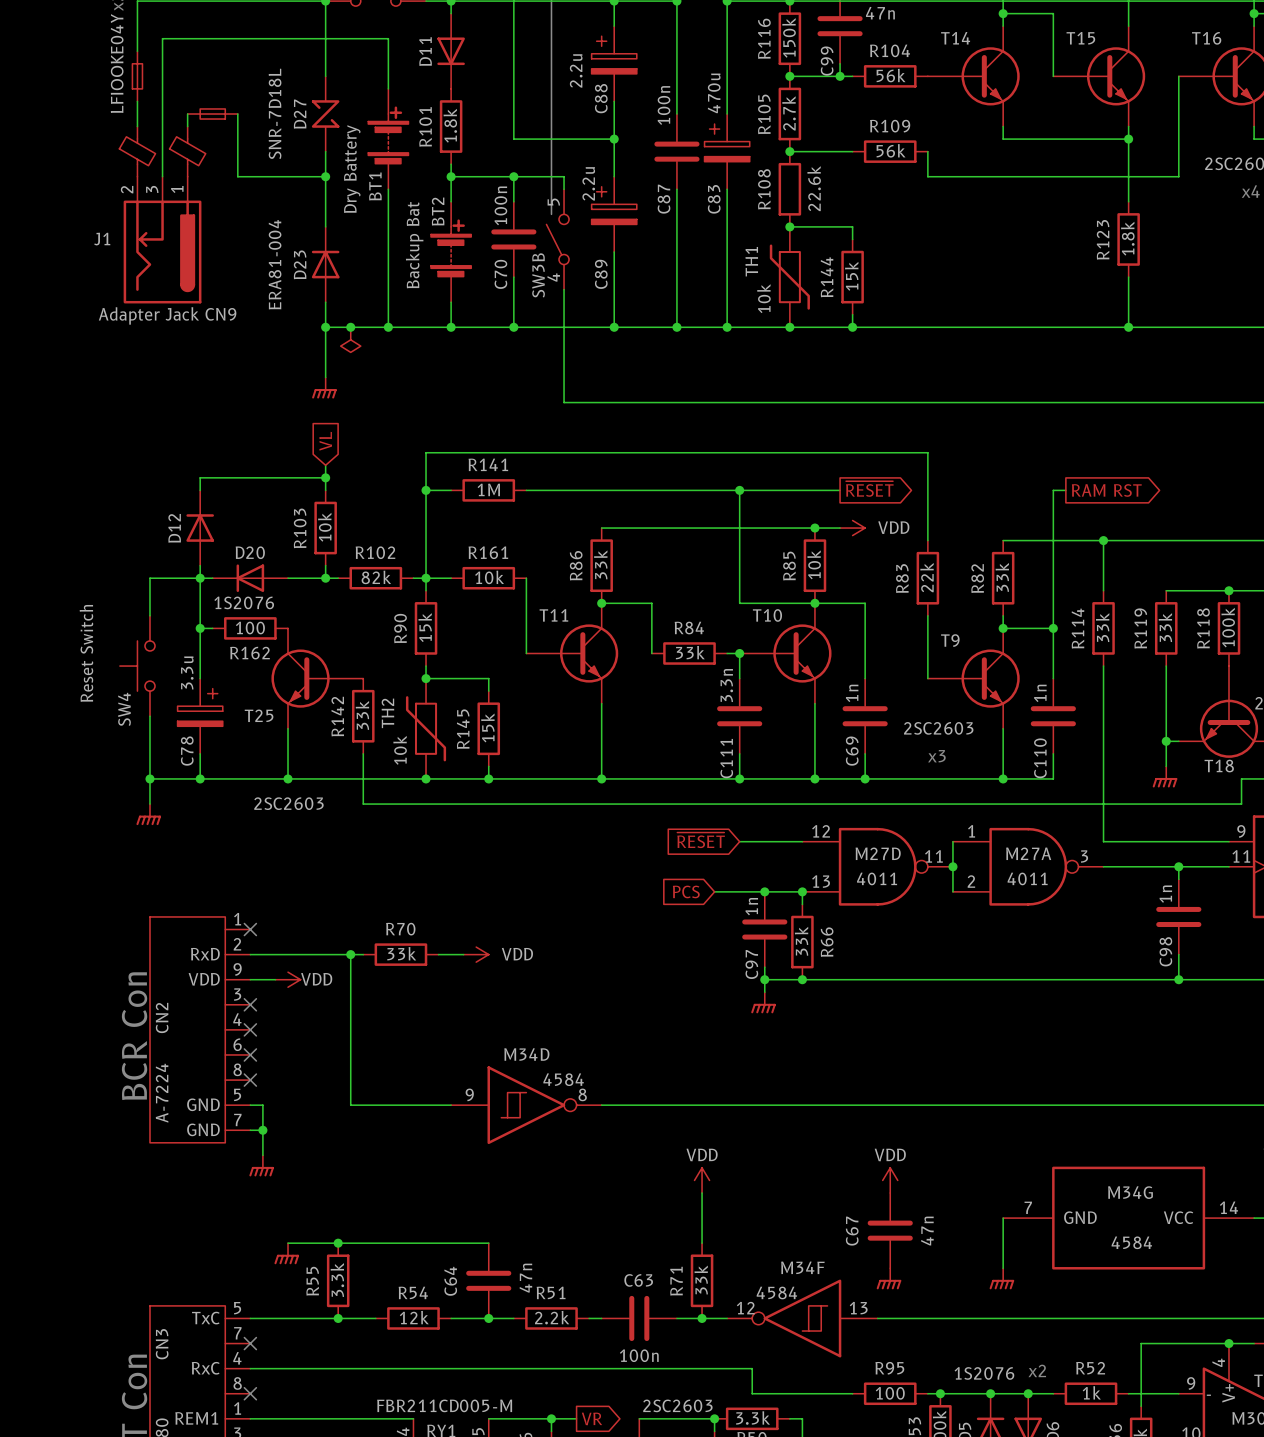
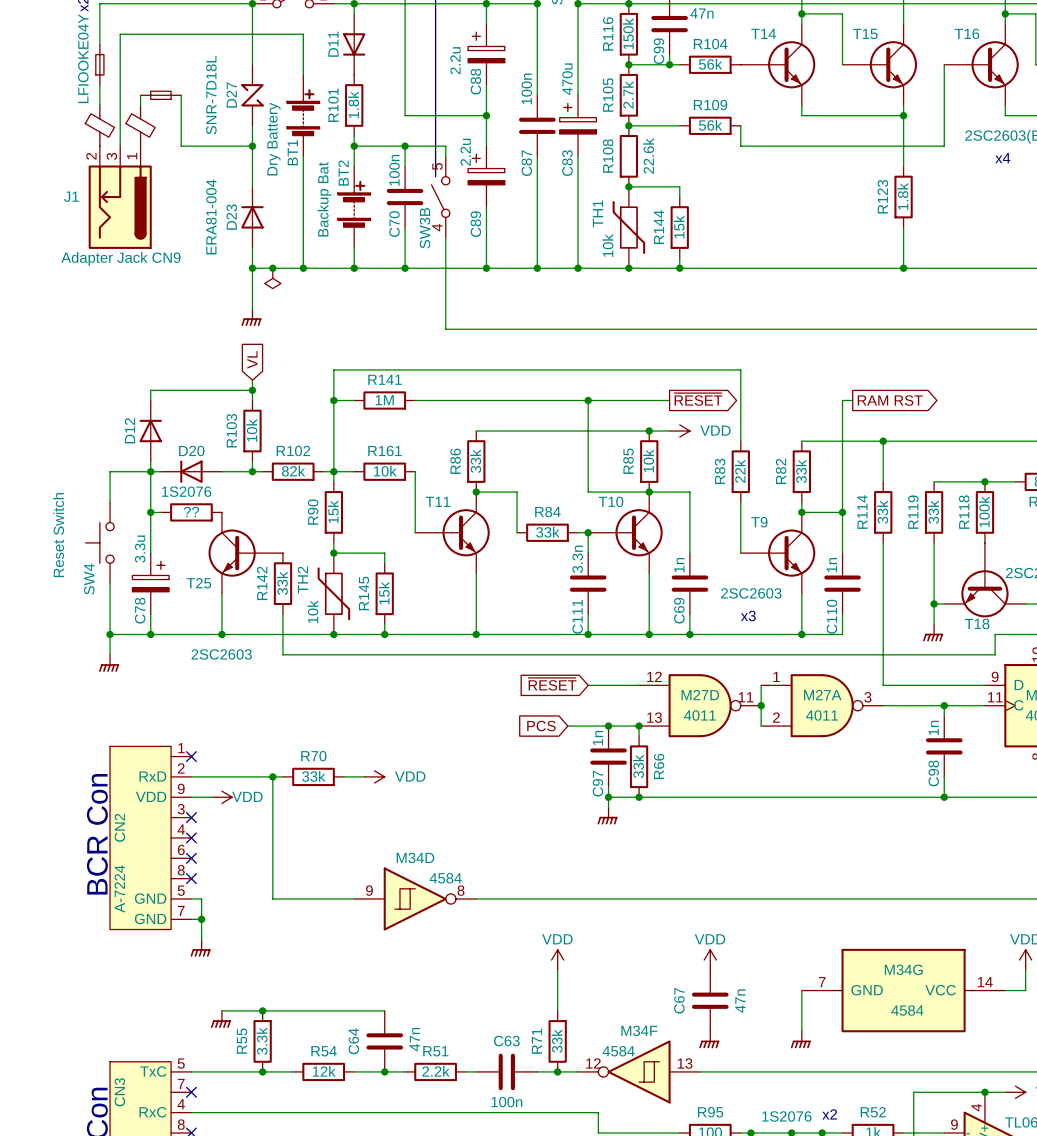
R162 value: 100 (250, 628) -> ?? (191, 511)
R162 name: R162 (250, 653) -> none

